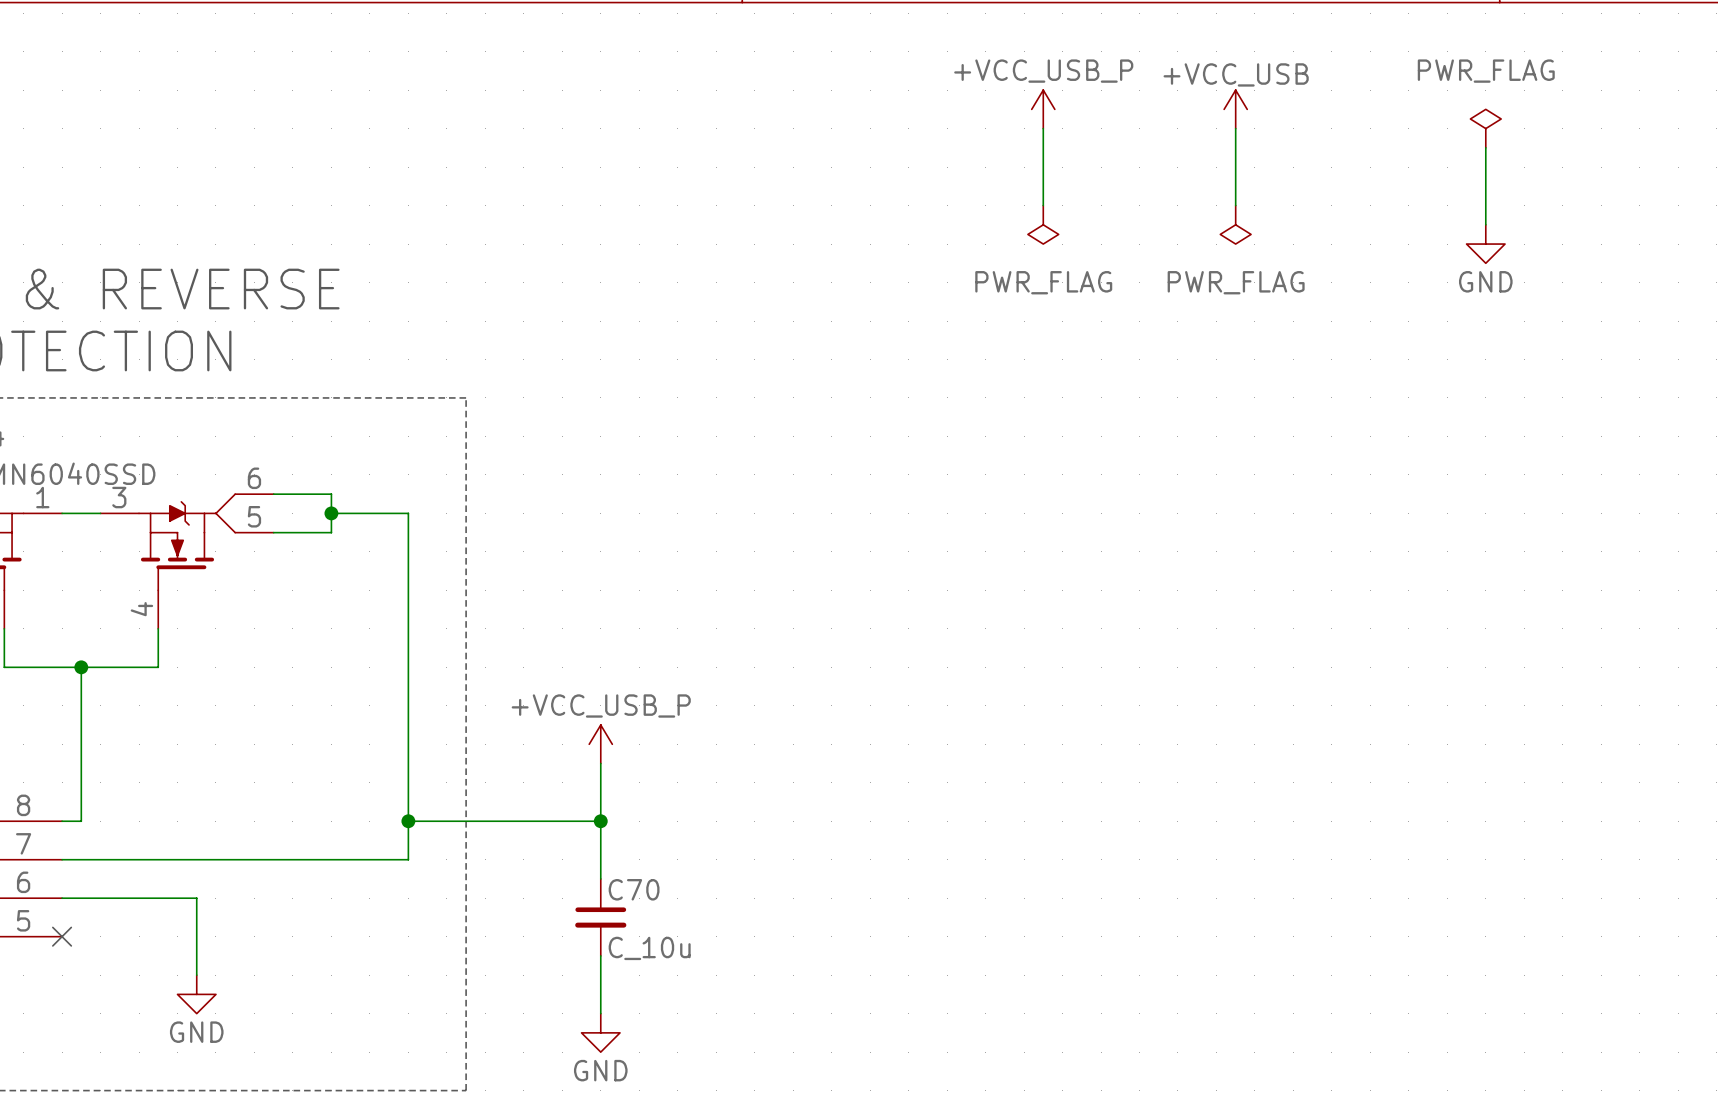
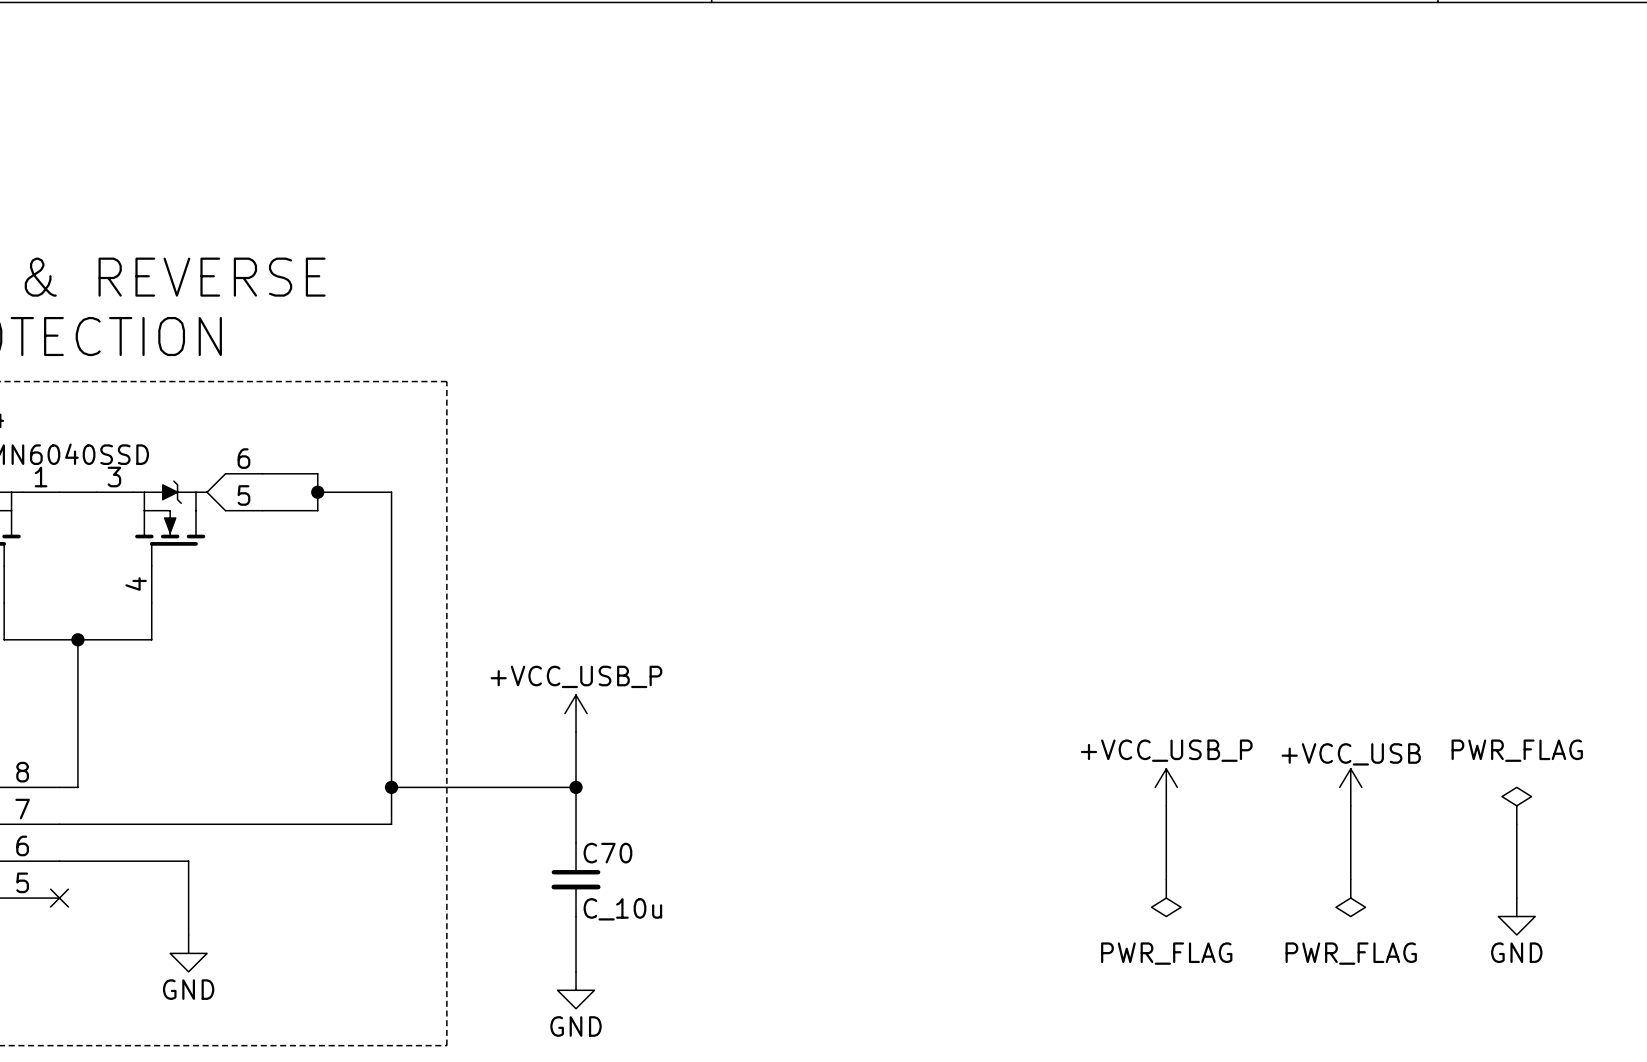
power symbol: +VCC_USB_P (1043, 109) -> none
power symbol: +VCC_USB (1235, 109) -> none
wire: (1043, 128) (1043, 205) -> none
wire: (1235, 128) (1235, 205) -> none
power symbol: PWR_FLAG (1485, 128) -> none
wire: (1485, 147) (1485, 224) -> none
power symbol: PWR_FLAG (1043, 224) -> none
power symbol: PWR_FLAG (1235, 224) -> none
power symbol: GND (1485, 244) -> none
power symbol: none -> +VCC_USB_P (1166, 787)
power symbol: none -> +VCC_USB (1350, 787)
wire: none -> (1166, 805) (1166, 879)
wire: none -> (1350, 805) (1350, 879)
power symbol: none -> PWR_FLAG (1516, 805)
wire: none -> (1516, 824) (1516, 898)
power symbol: none -> PWR_FLAG (1166, 898)
power symbol: none -> PWR_FLAG (1350, 898)
power symbol: none -> GND (1516, 916)

